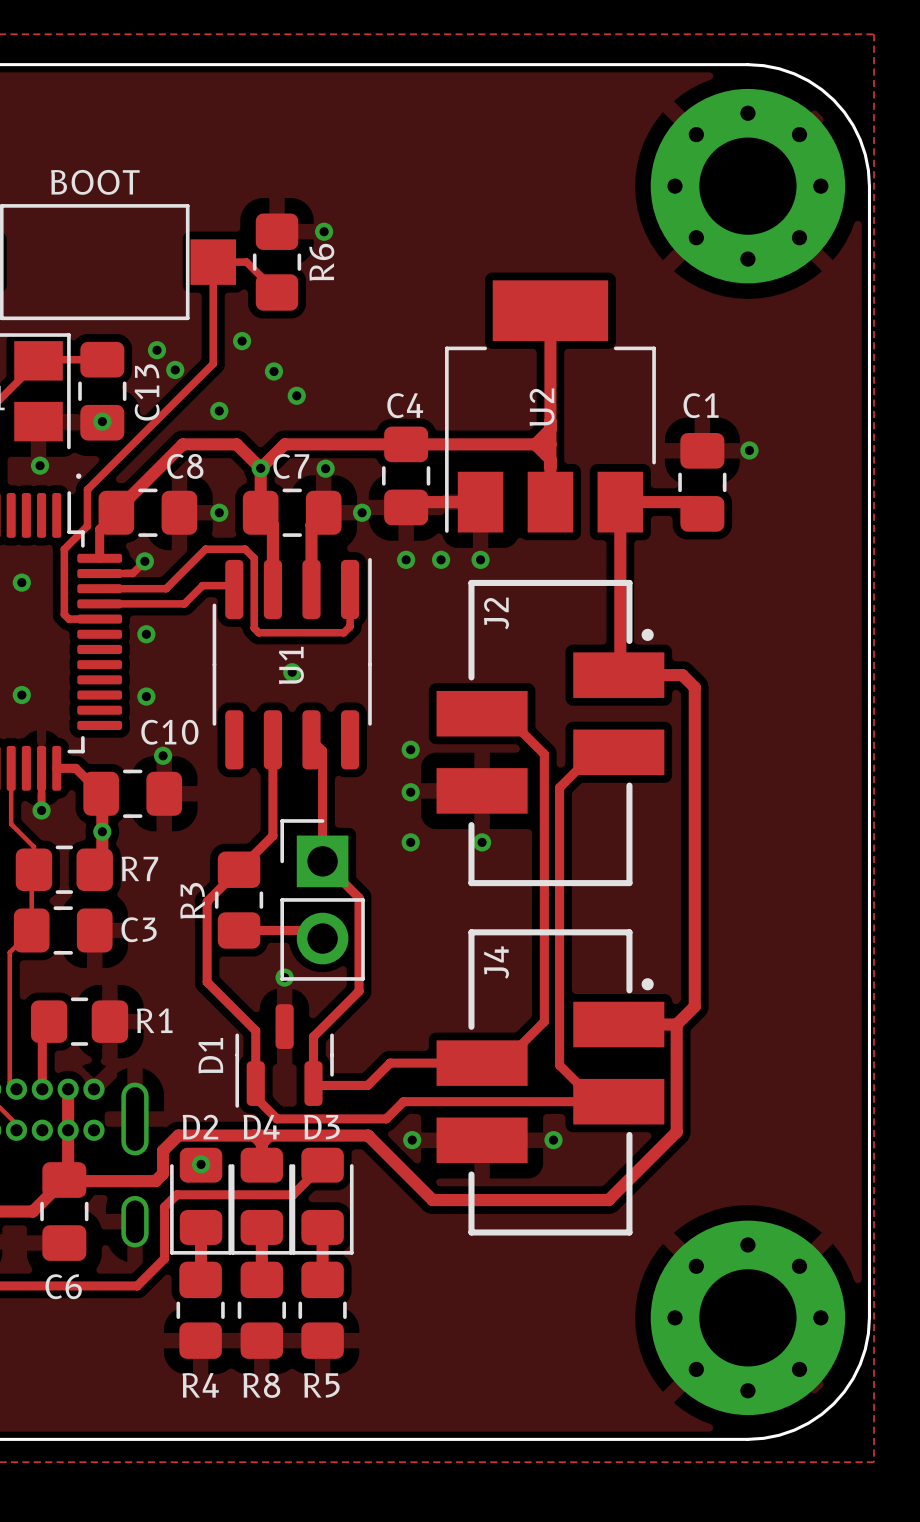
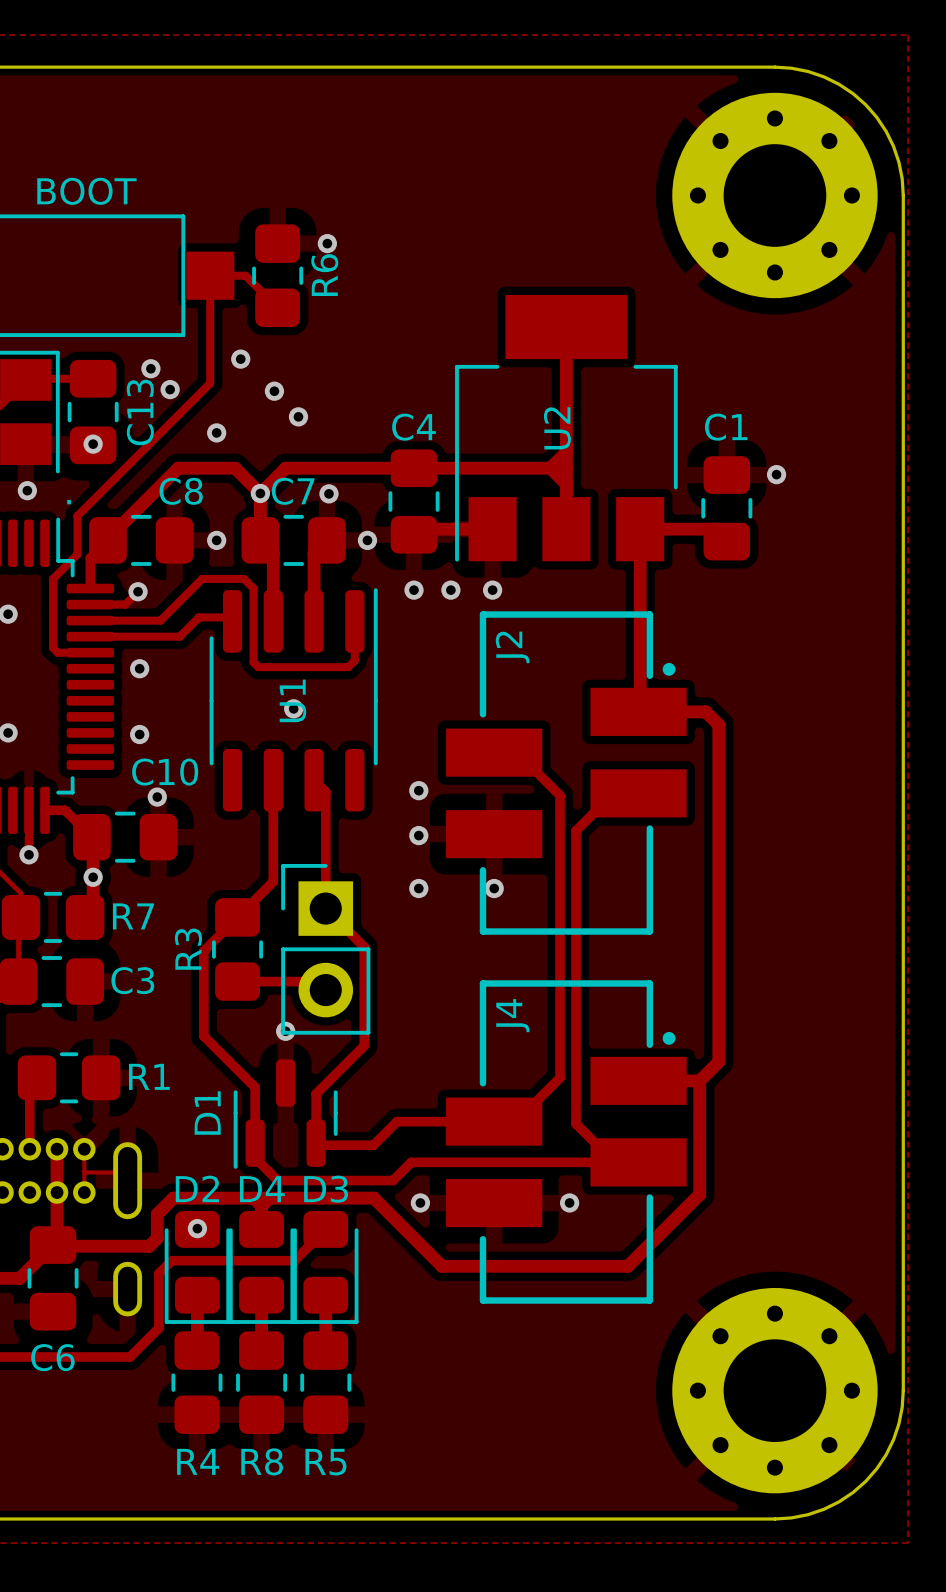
track: none -> (84, 1149) (84, 1192)
track: none -> (84, 1171) (119, 1172) (127, 1180)

